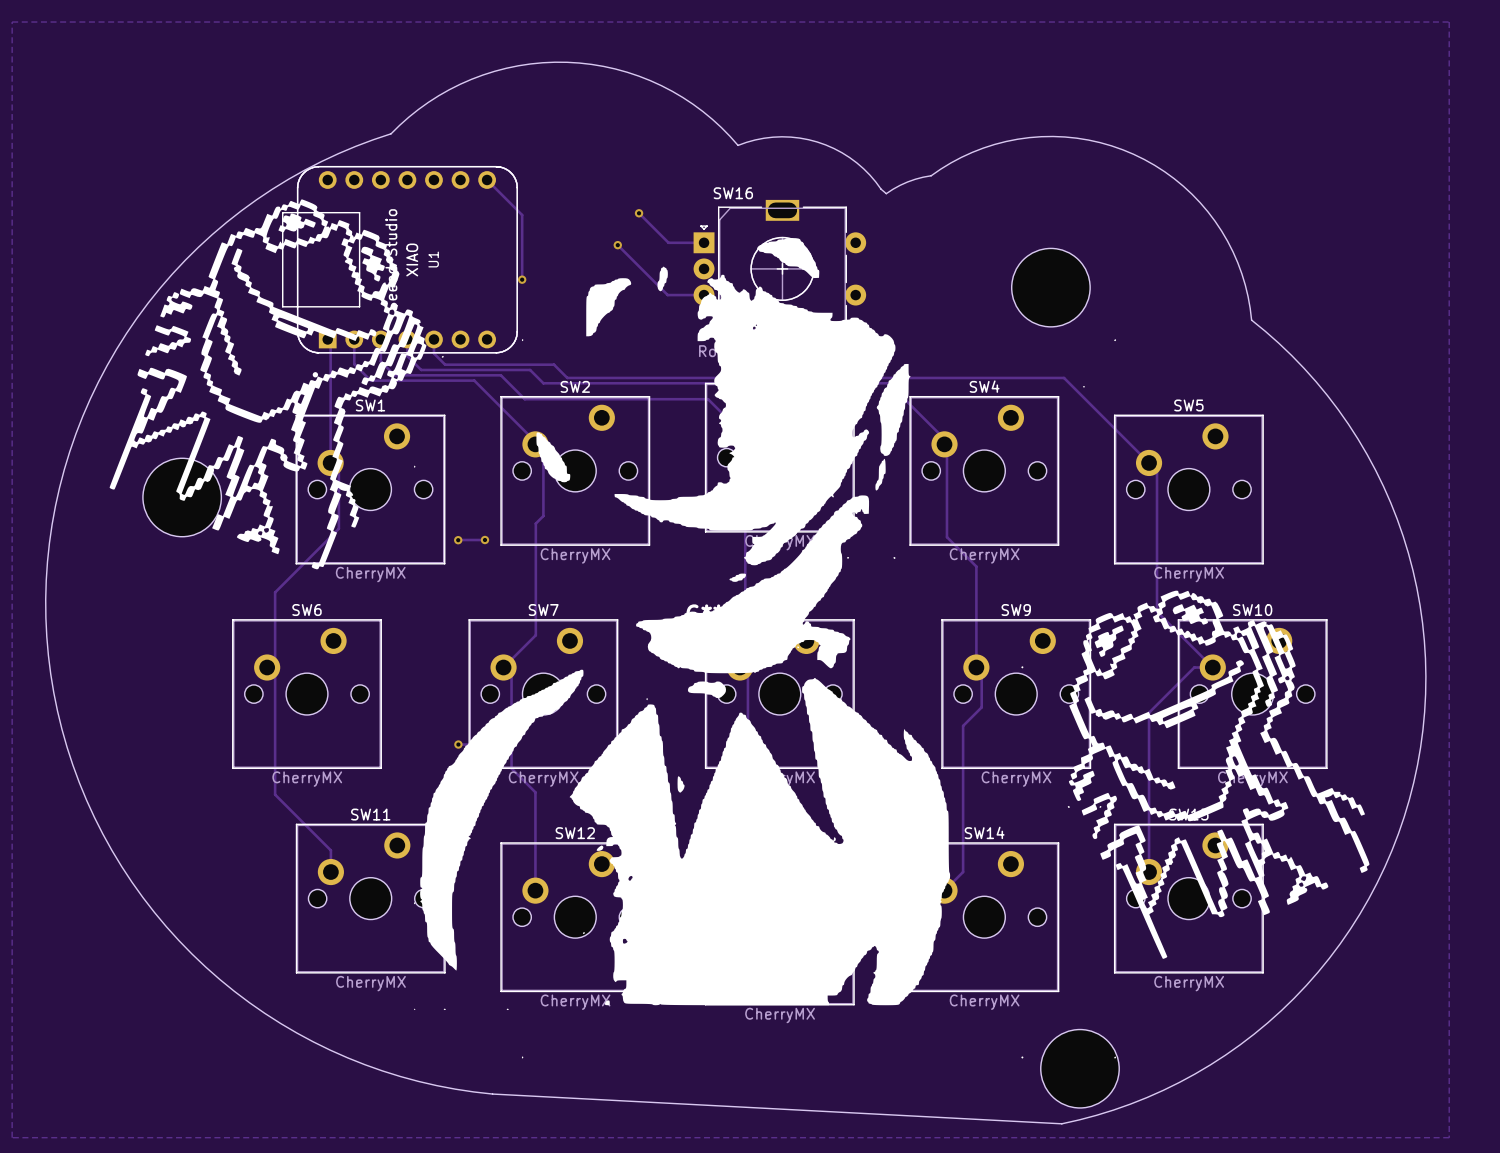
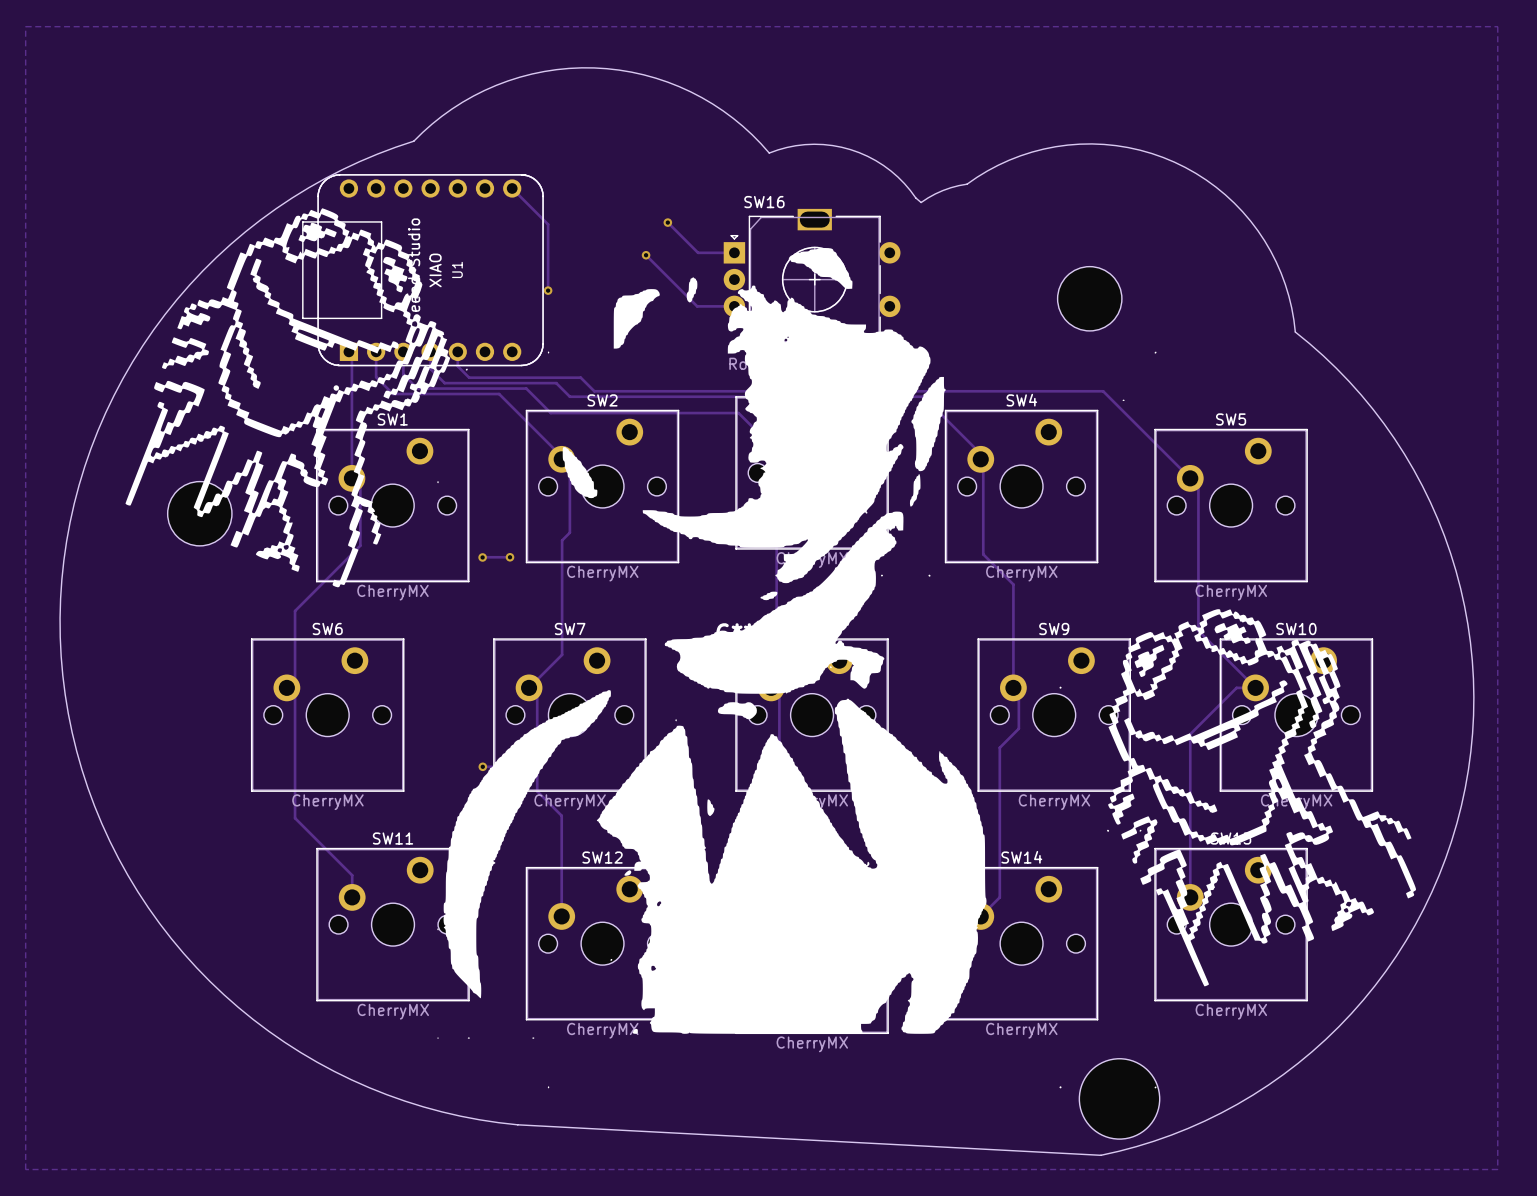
part footprint: [1011, 248, 1091, 327] -> [1057, 266, 1122, 331]
part footprint: [142, 458, 222, 537] -> [167, 481, 232, 546]

